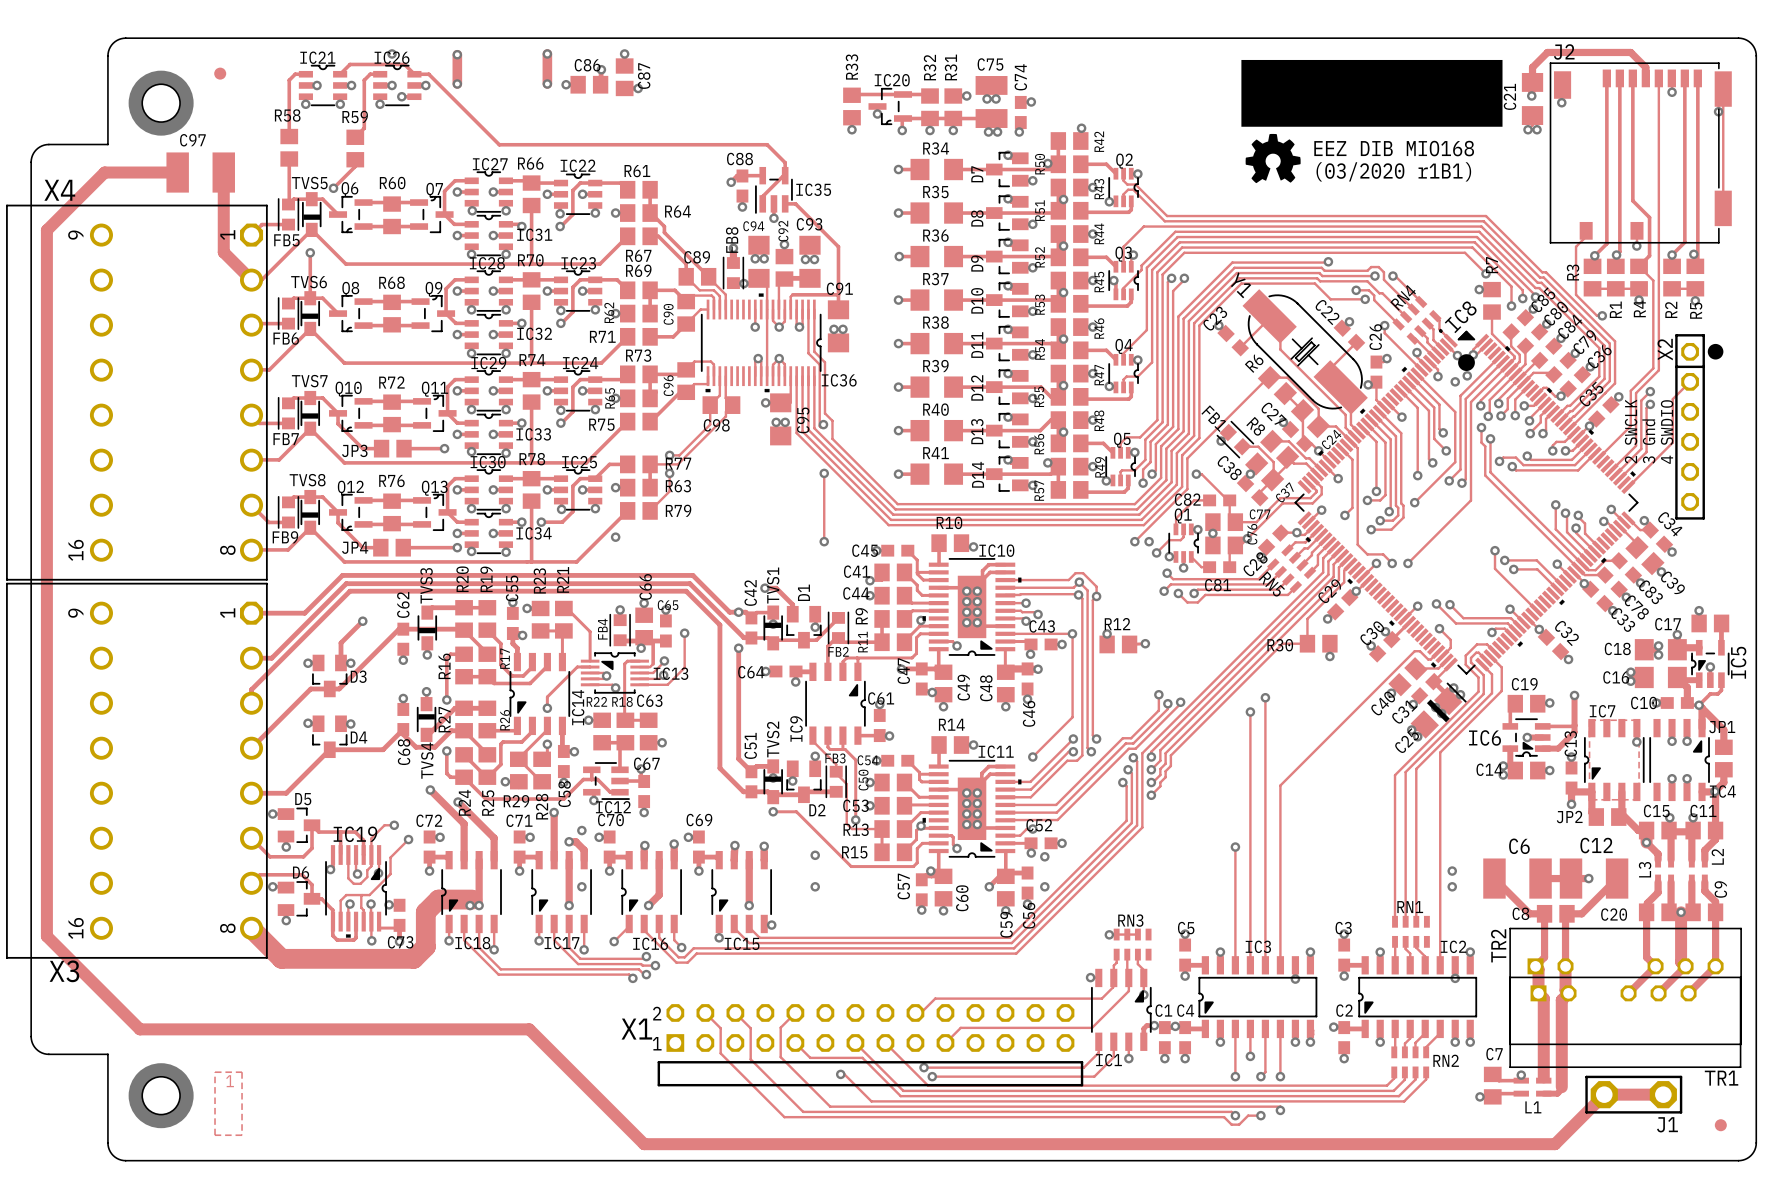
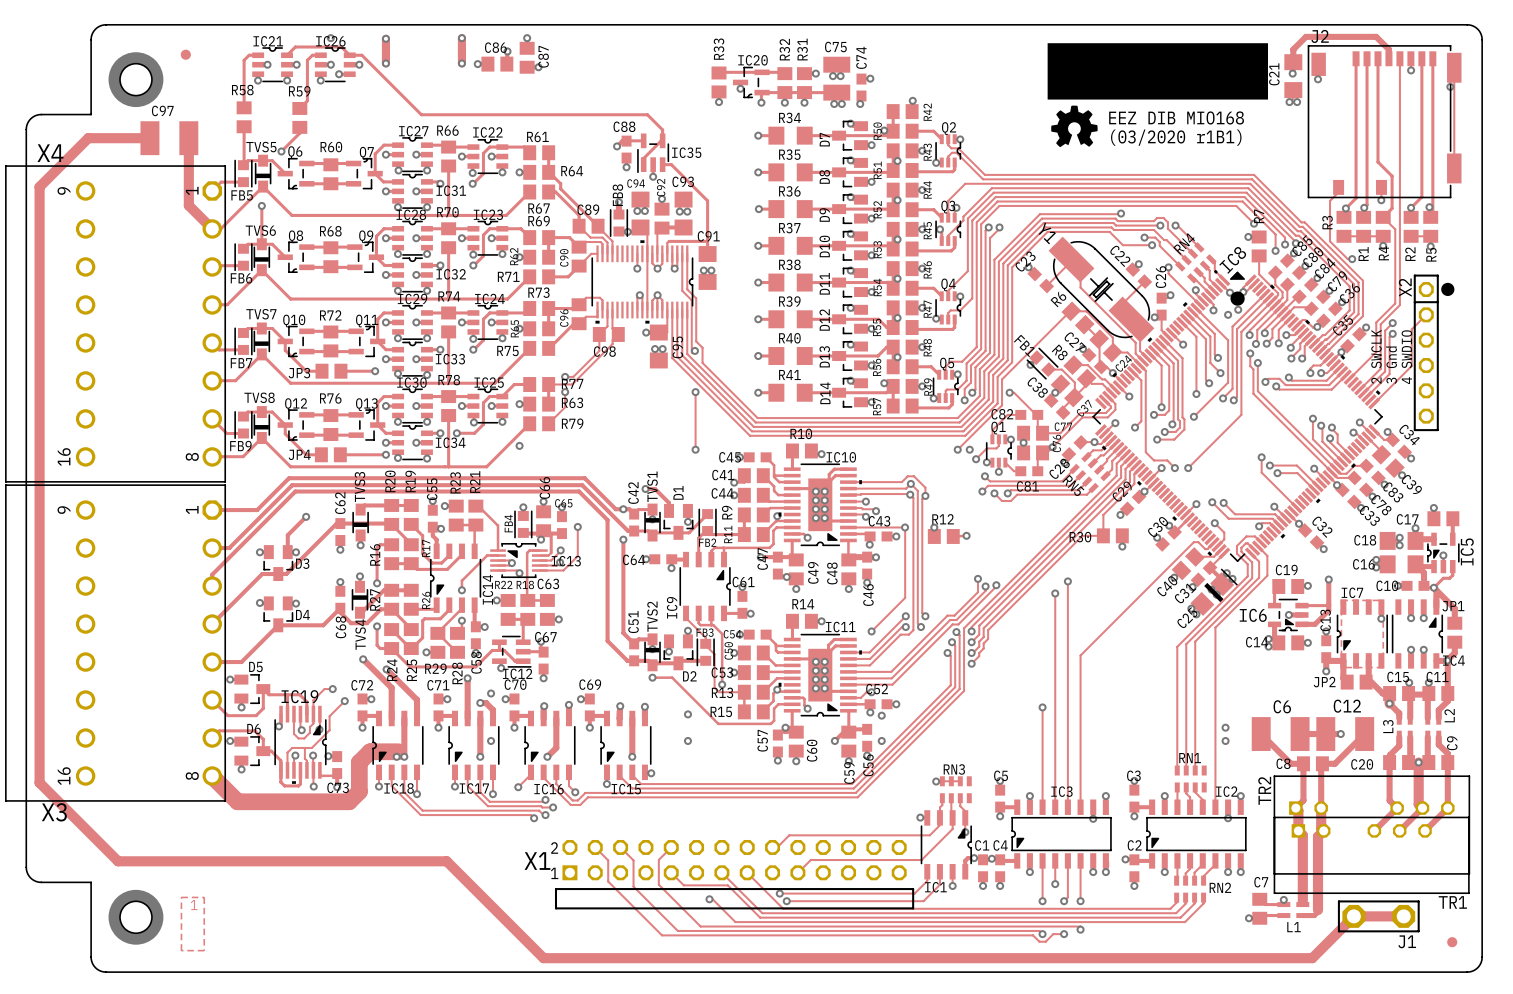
IC36 name: IC36 (839, 380) -> none

